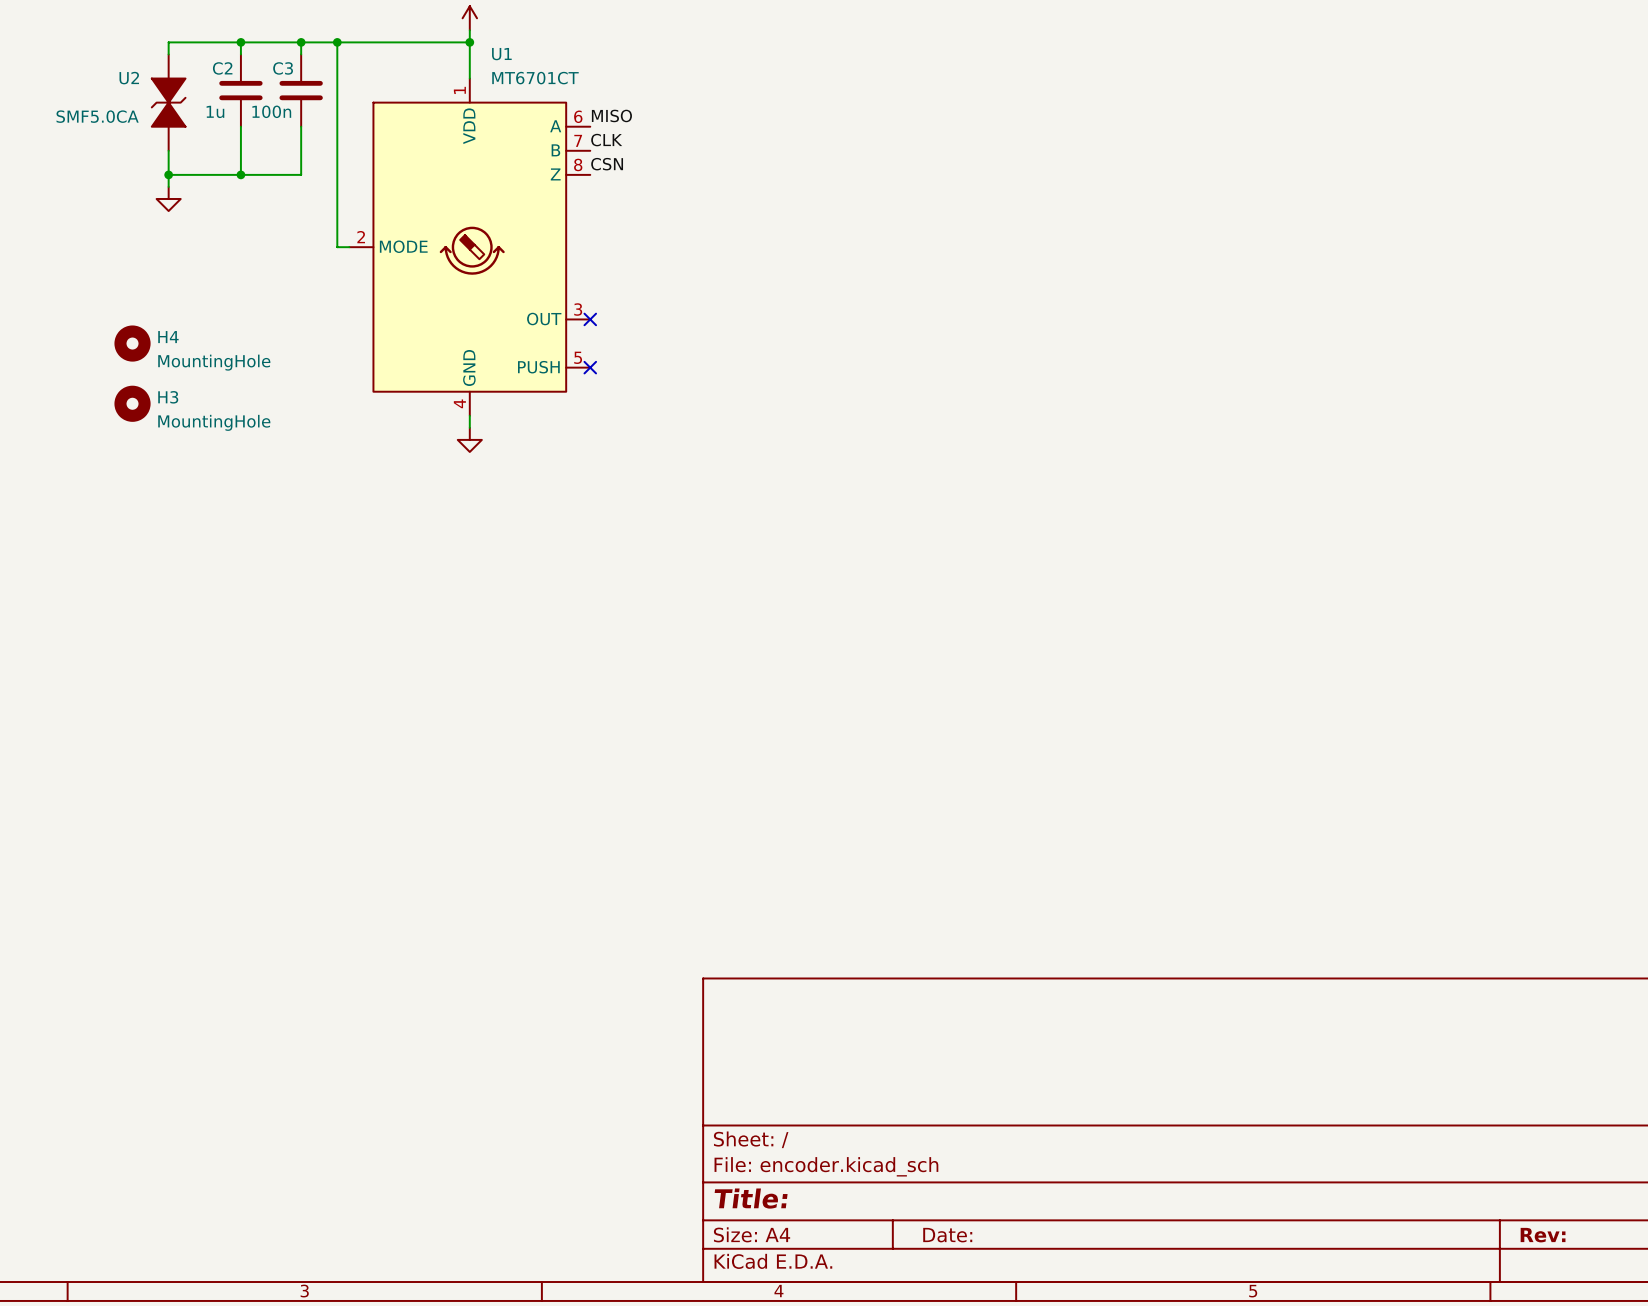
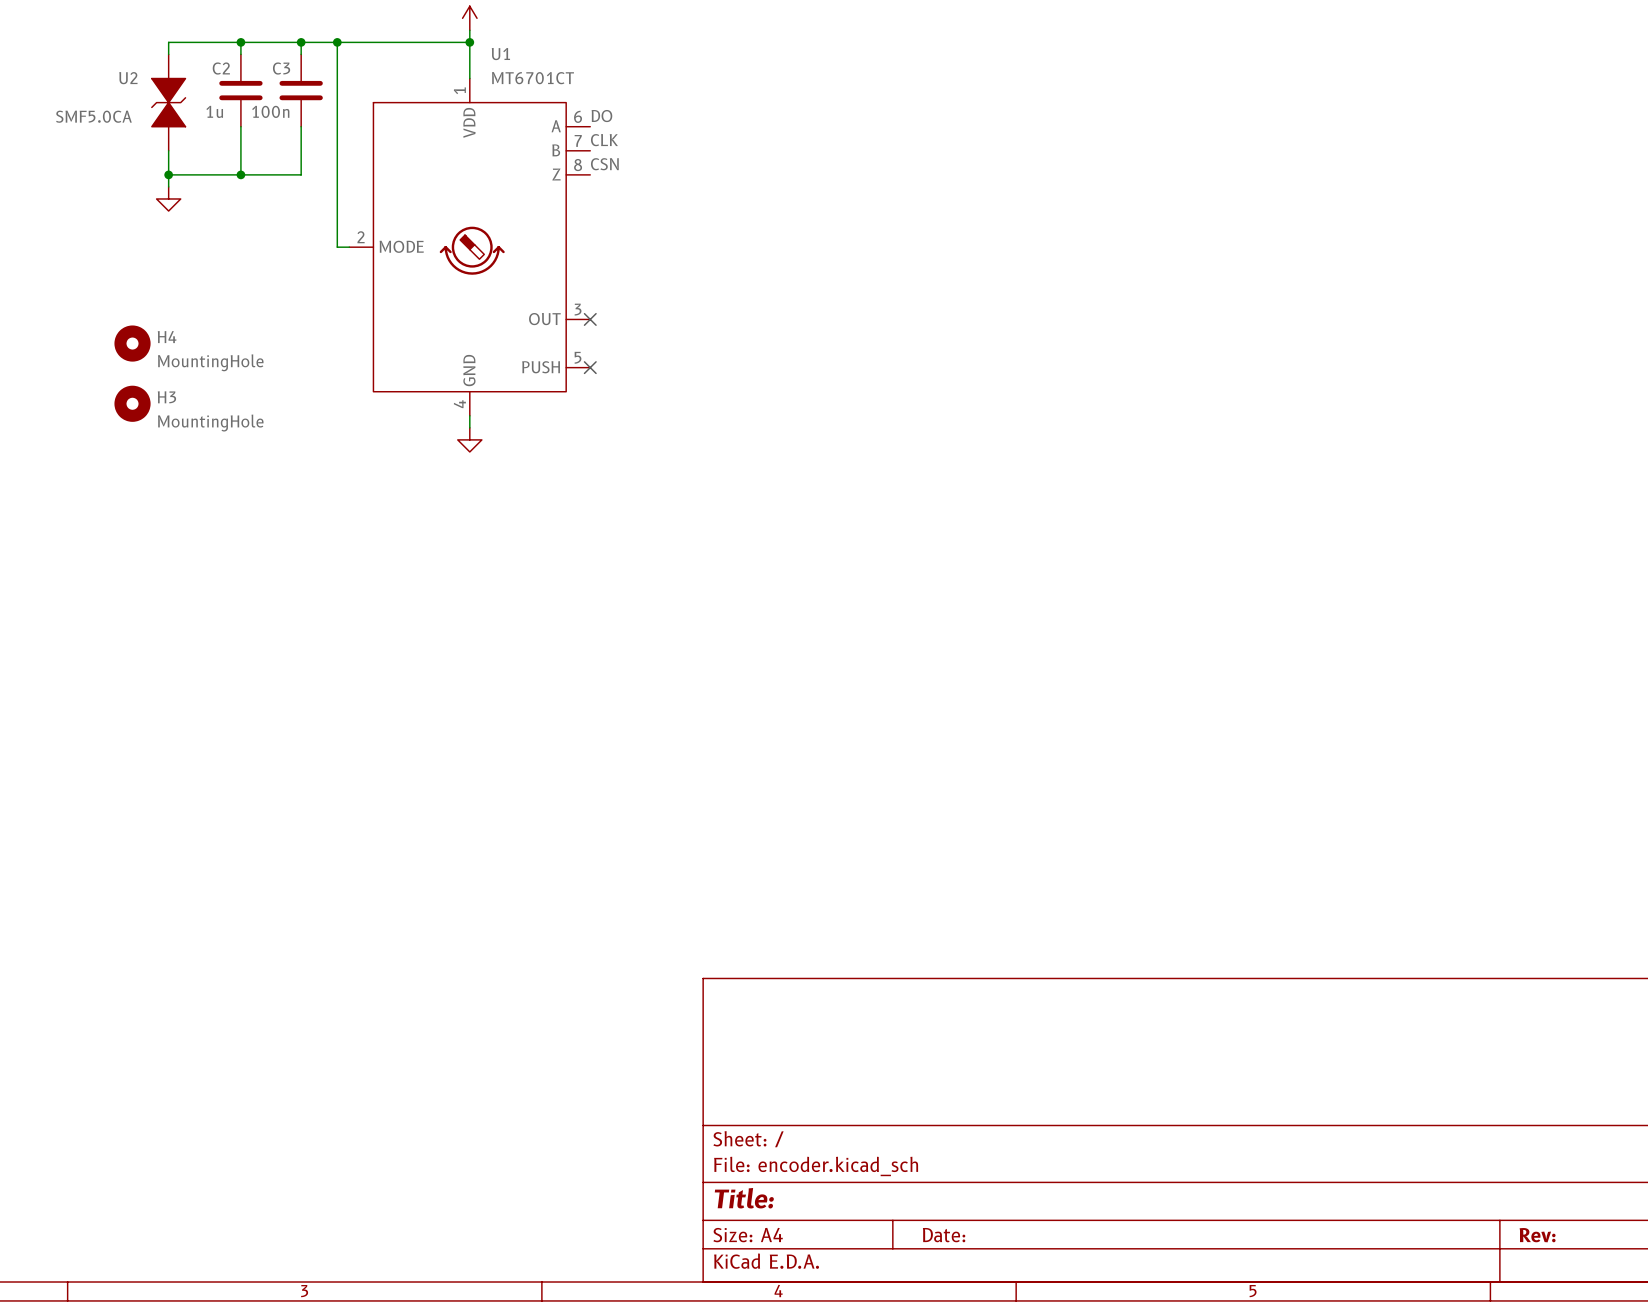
label: MISO (611, 115) -> DO (601, 116)

